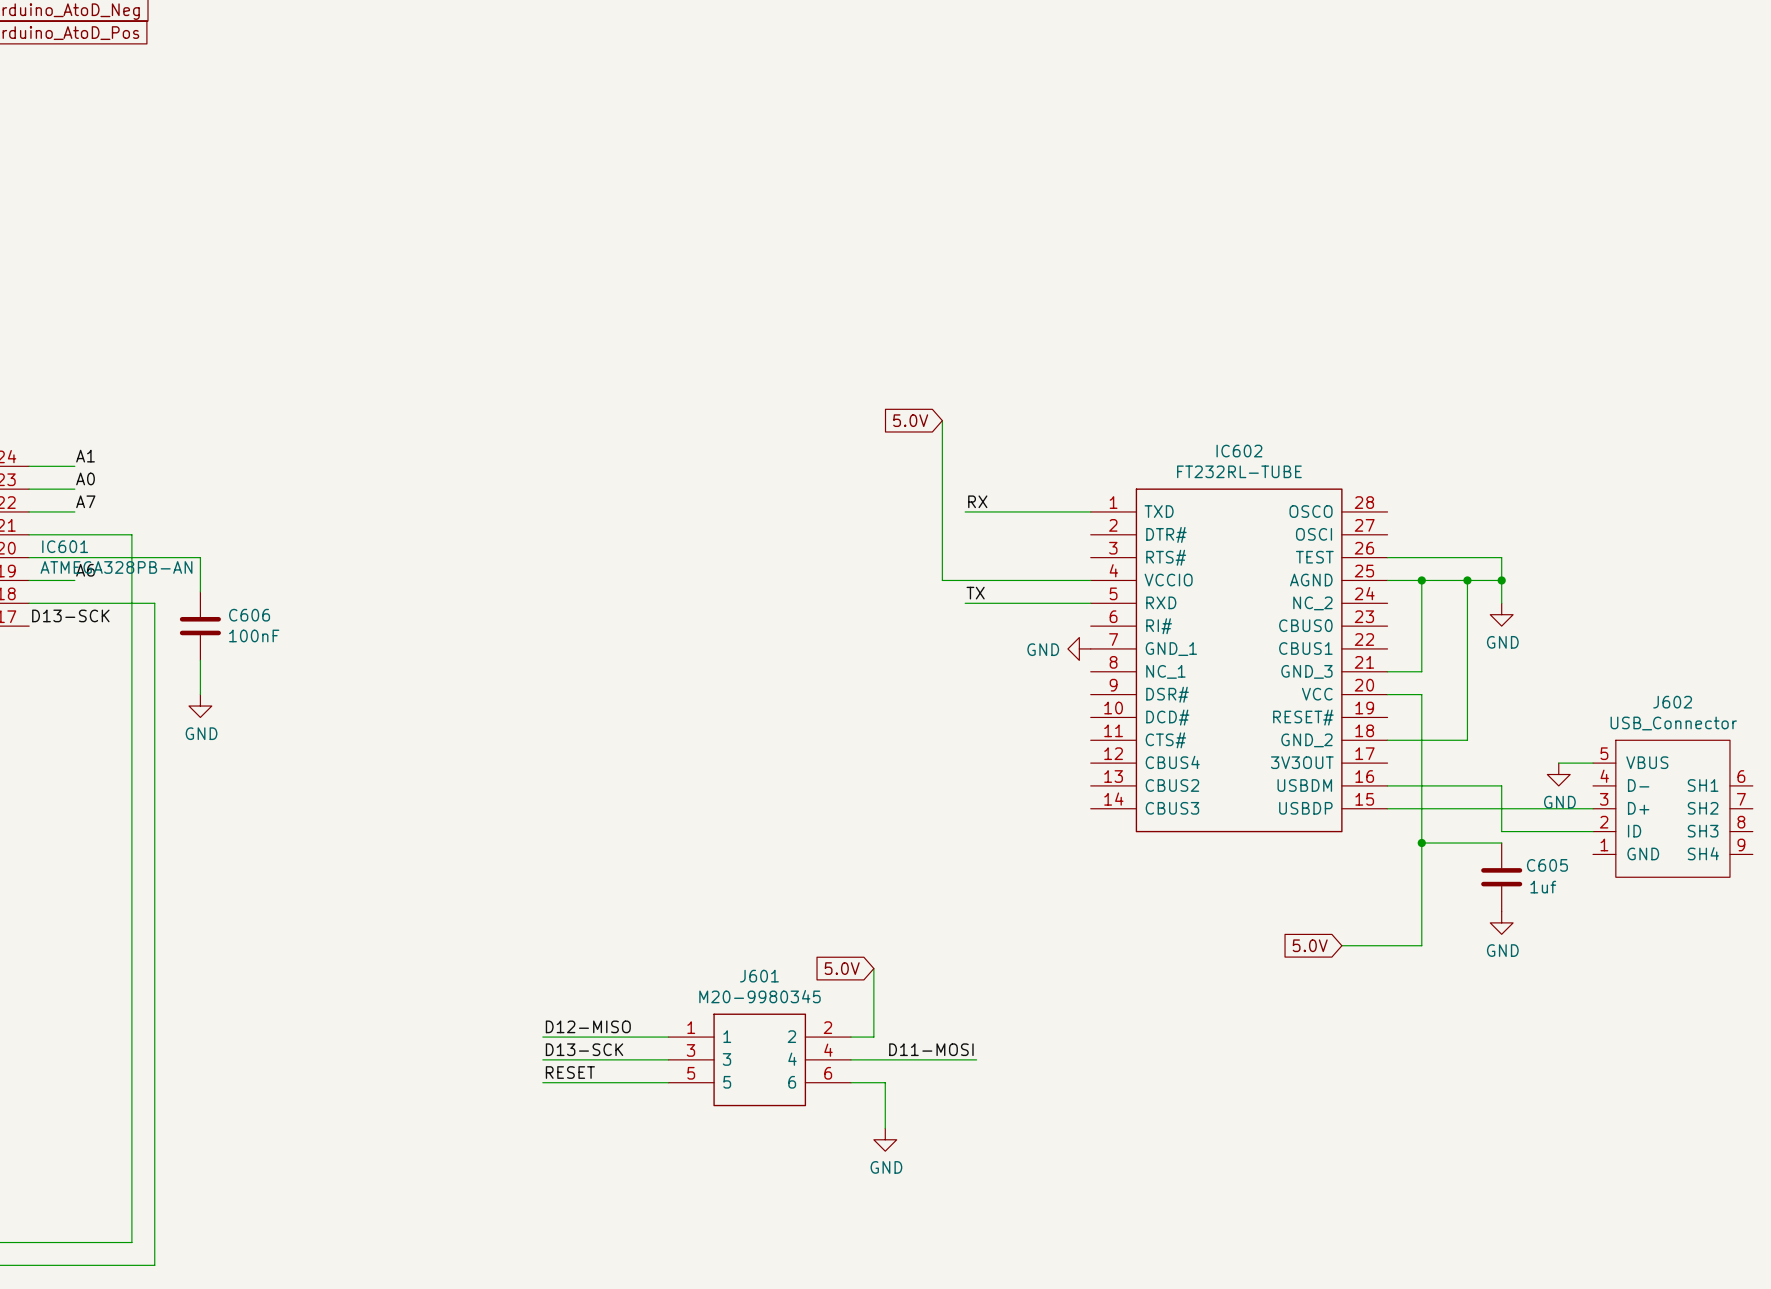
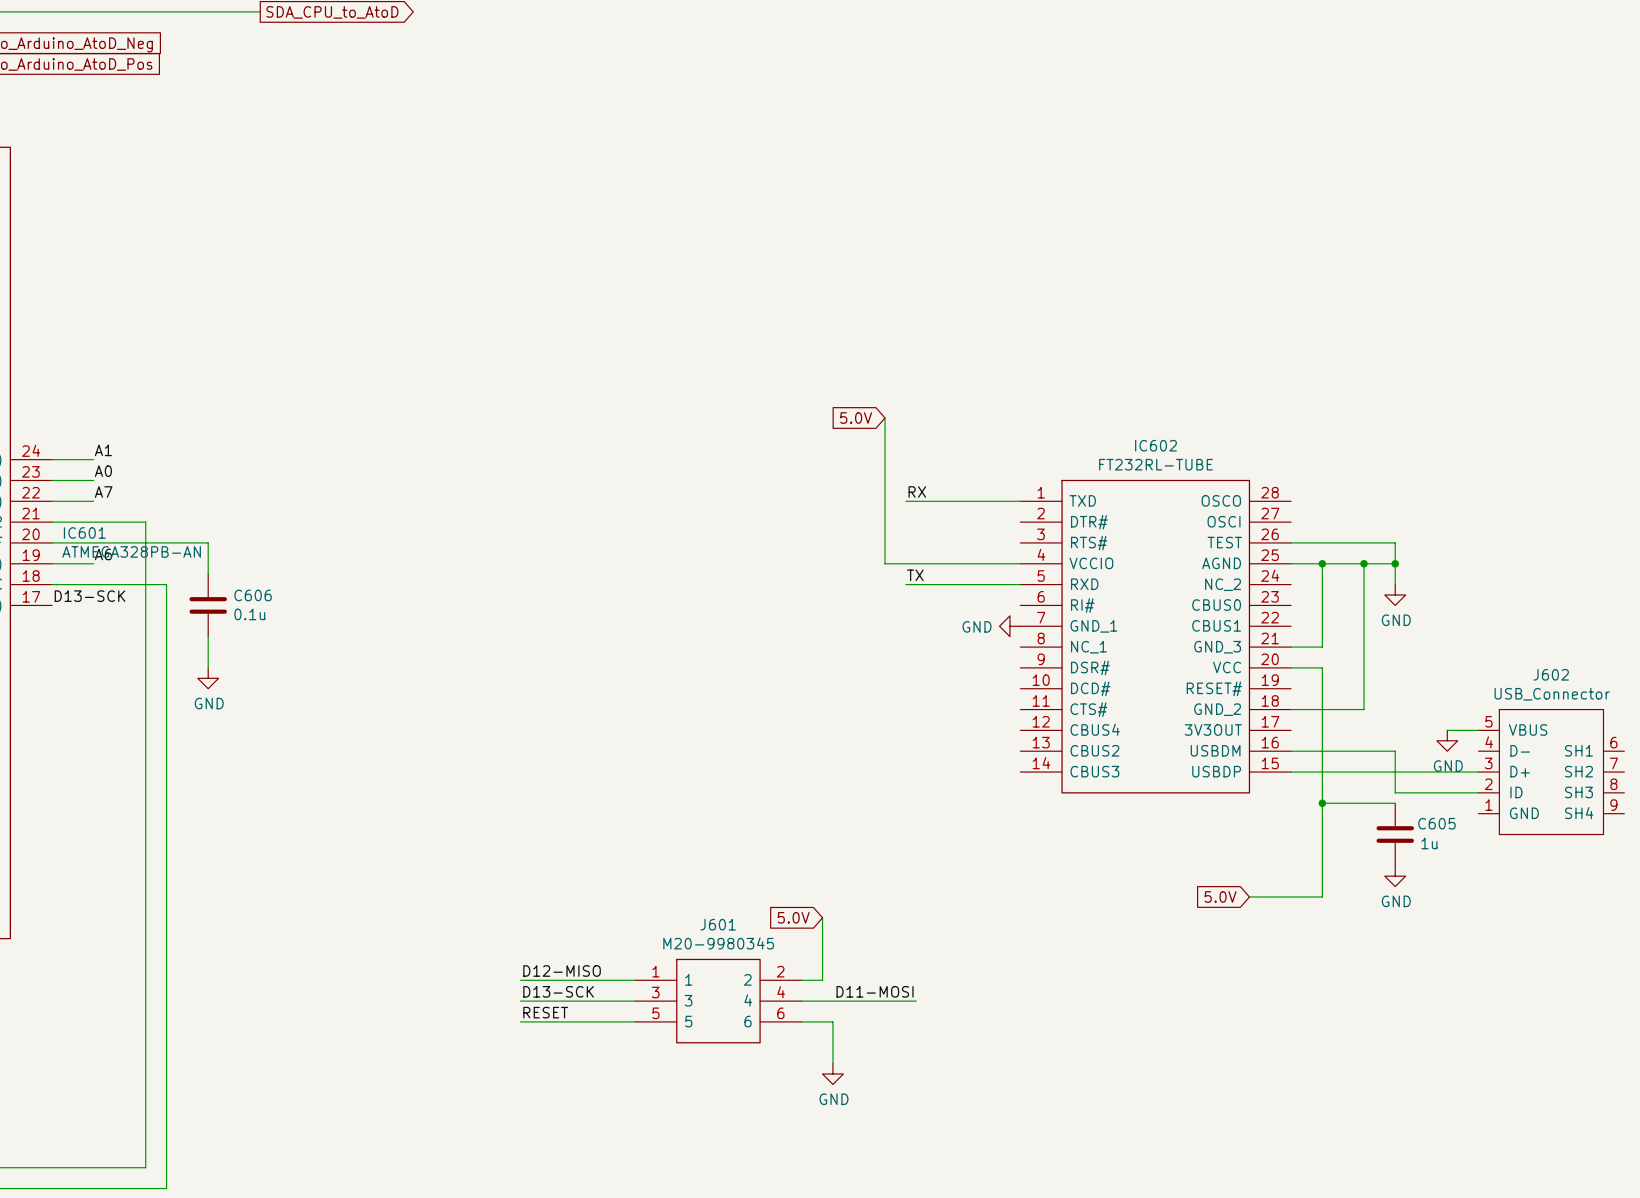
C606 value: 100nF (254, 635) -> 0.1u (249, 614)
C605 value: 1uf (1543, 887) -> 1u (1429, 843)

